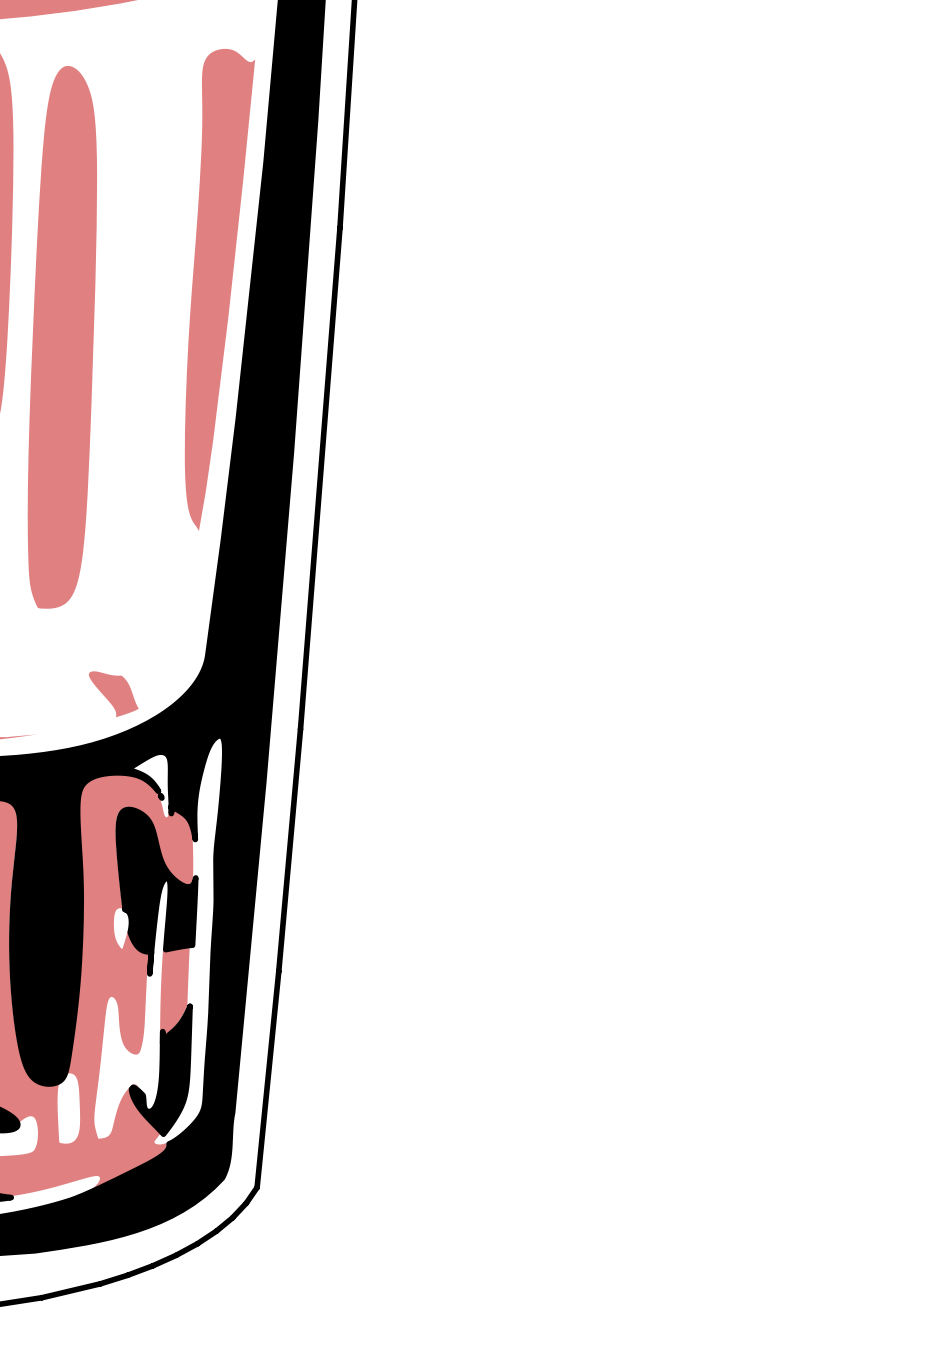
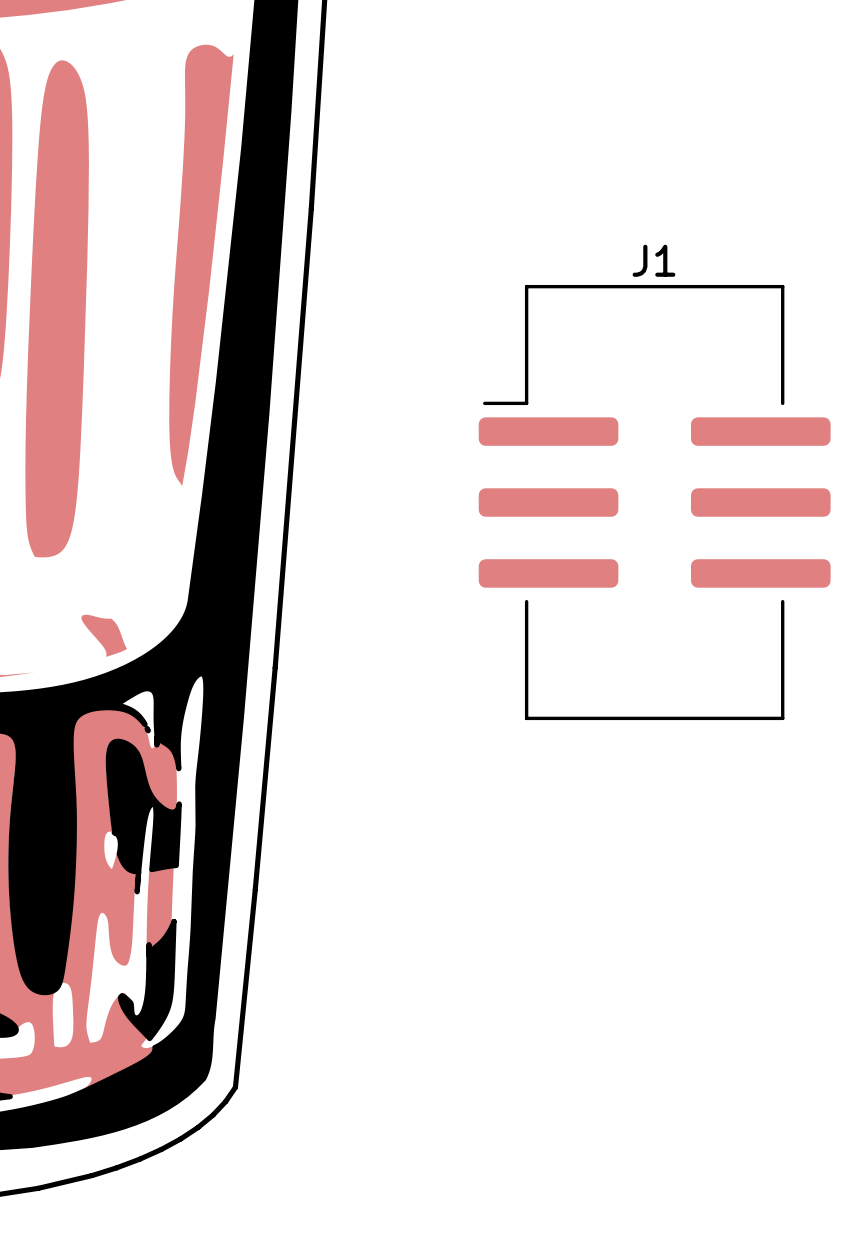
J1: none -> (654, 502)

